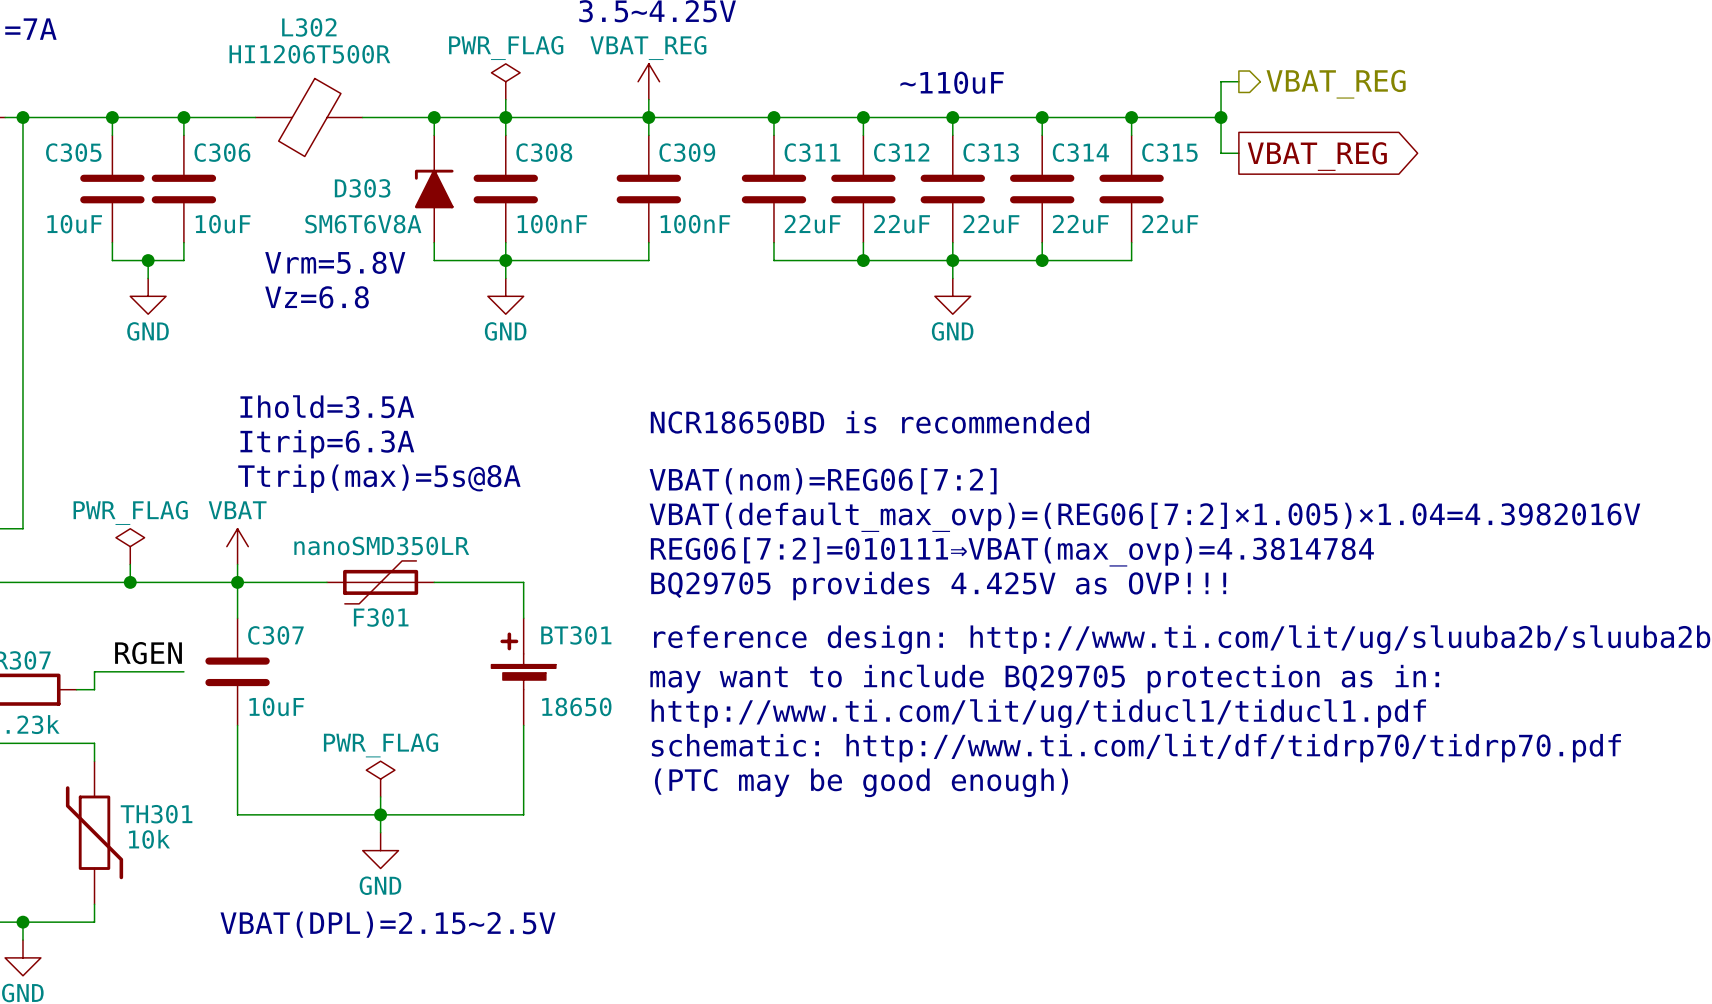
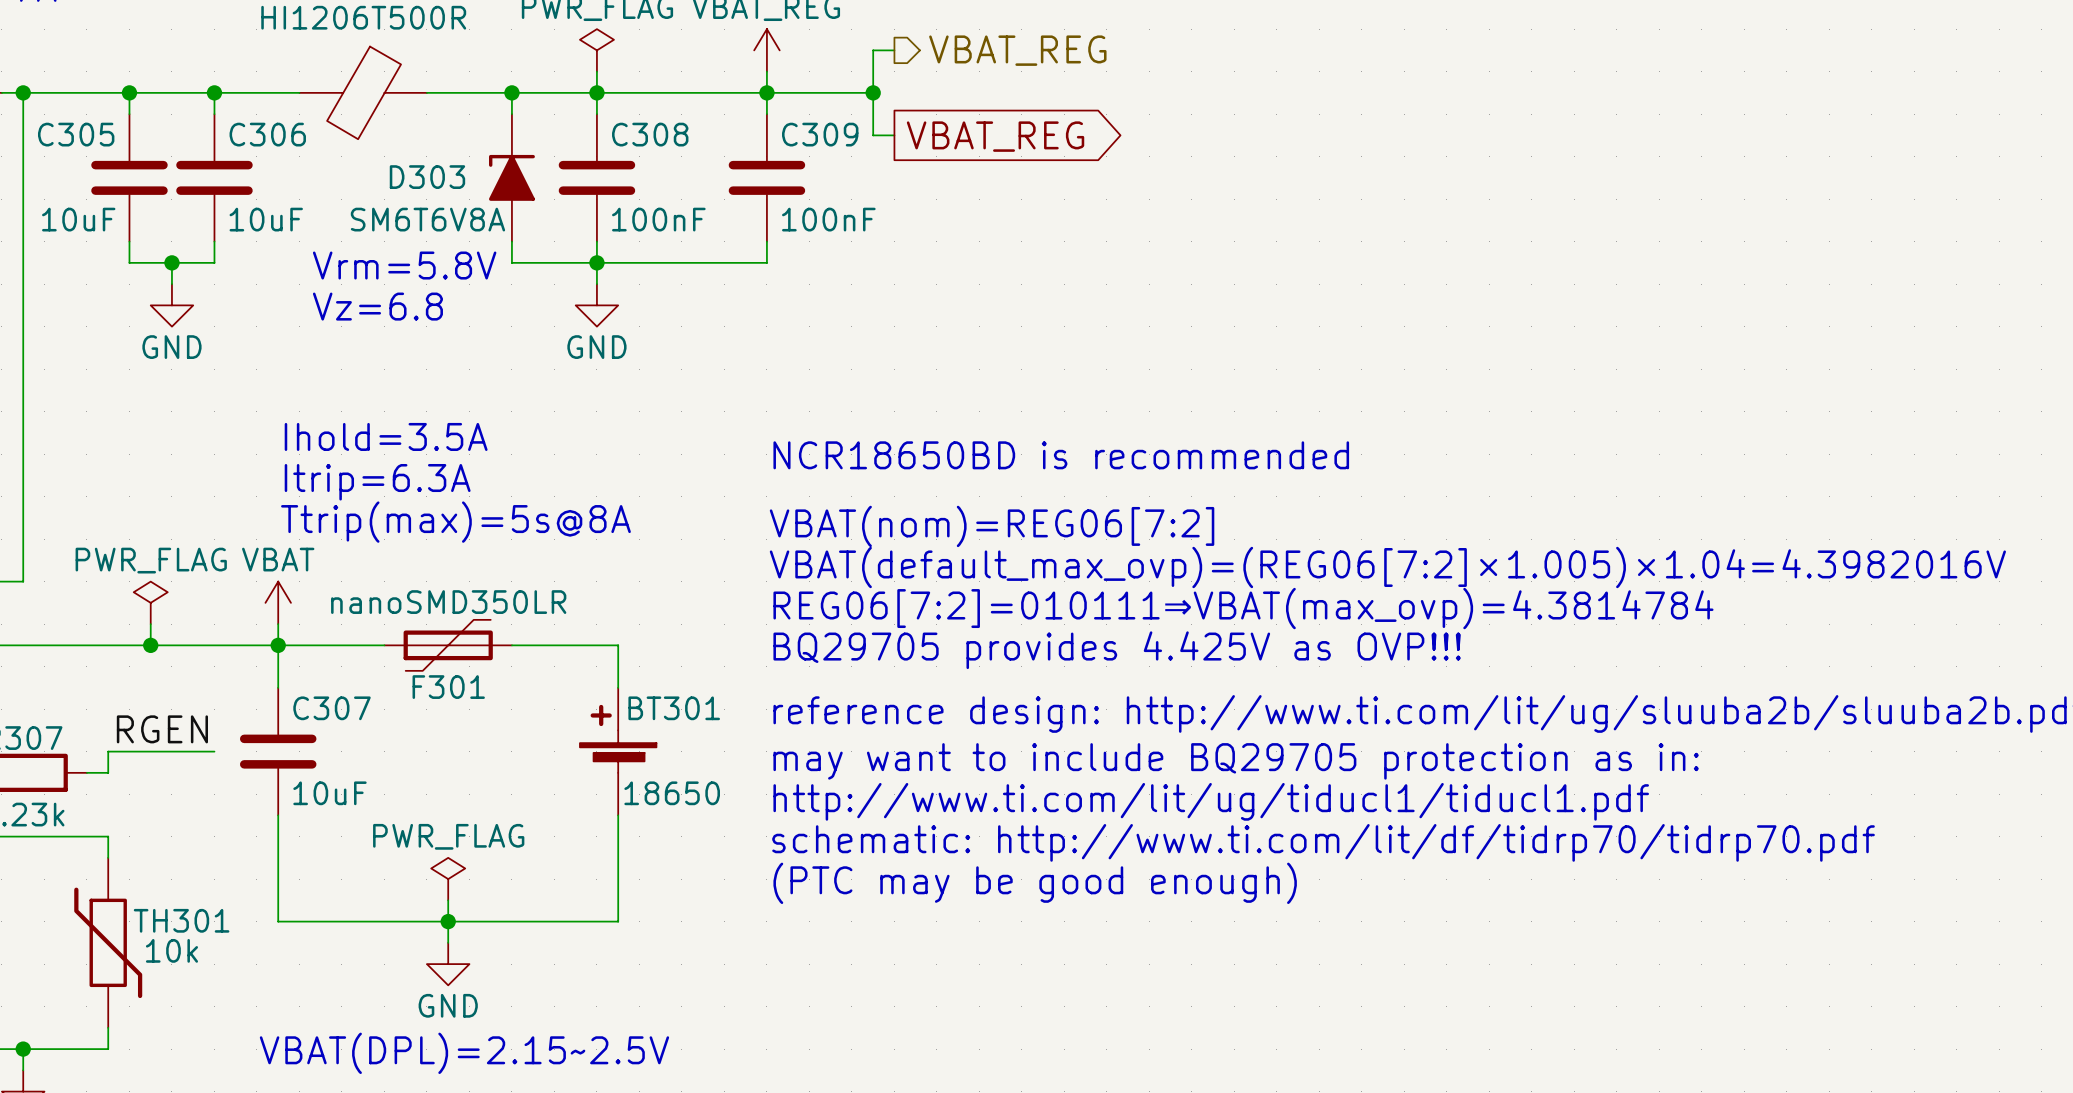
wire: none -> (894, 50) (873, 50) (873, 135) (894, 135)
wire: (1238, 81) (1221, 81) (1221, 153) (1238, 153) -> none
text: ~110uF (952, 82) -> none
hierarchical label: none -> VBAT_REG (1017, 50)
hierarchical label: VBAT_REG (1336, 84) -> none
wire: (738, 117) (1221, 117) -> none
wire: (773, 117) (773, 135) -> none
junction position: (773, 117) -> (873, 92)
wire: (863, 117) (863, 135) -> none
junction: (863, 117) -> none
wire: (952, 117) (952, 135) -> none
junction: (952, 117) -> none
wire: (1042, 117) (1042, 135) -> none
junction: (1042, 117) -> none
wire: (1131, 117) (1131, 135) -> none
junction: (1131, 117) -> none
junction: (1221, 117) -> none
global label: none -> VBAT_REG (995, 136)
global label: VBAT_REG (1317, 156) -> none
C311: 22uF (773, 189) -> none
C312: 22uF (863, 189) -> none
C313: 22uF (952, 189) -> none
C314: 22uF (1042, 189) -> none
C315: 22uF (1131, 189) -> none
wire: (773, 242) (773, 260) (1131, 260) (1131, 242) -> none
wire: (863, 242) (863, 260) -> none
wire: (952, 242) (952, 278) -> none
wire: (1042, 242) (1042, 260) -> none
junction: (863, 260) -> none
junction: (952, 260) -> none
junction: (1042, 260) -> none
power symbol: GND (952, 296) -> none

